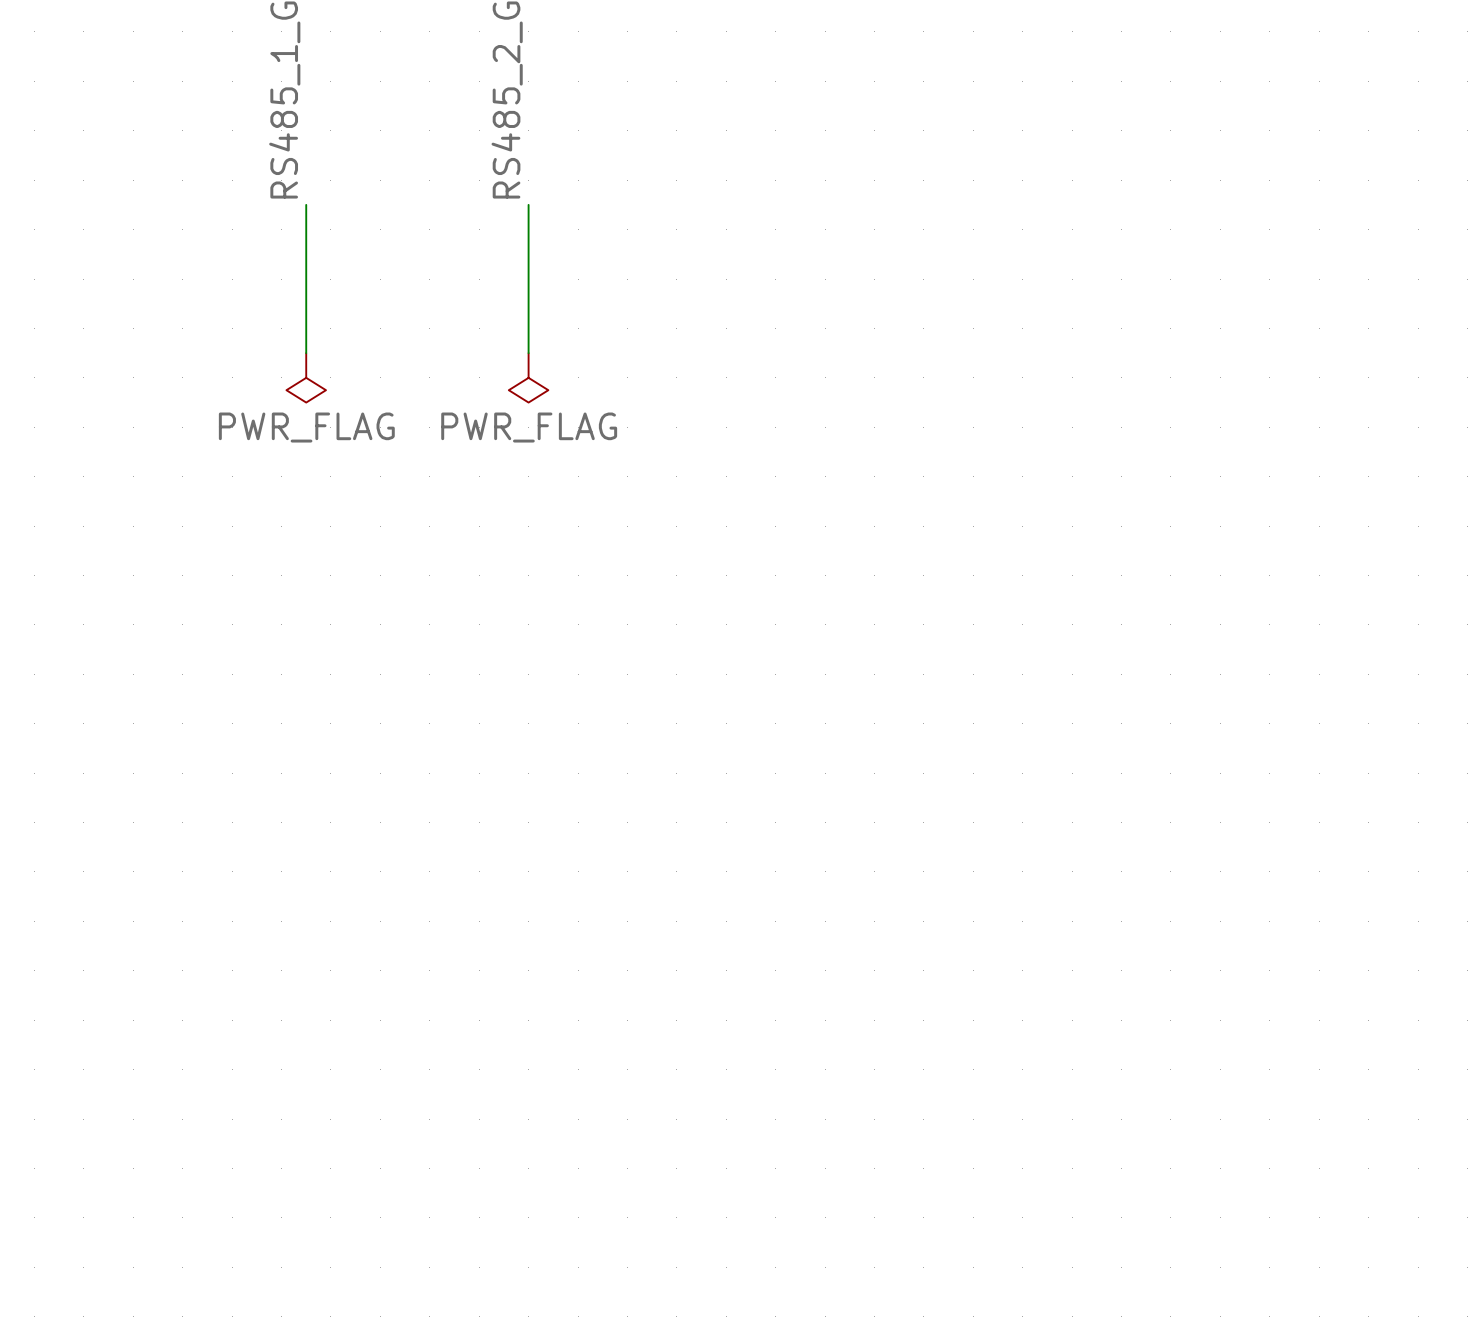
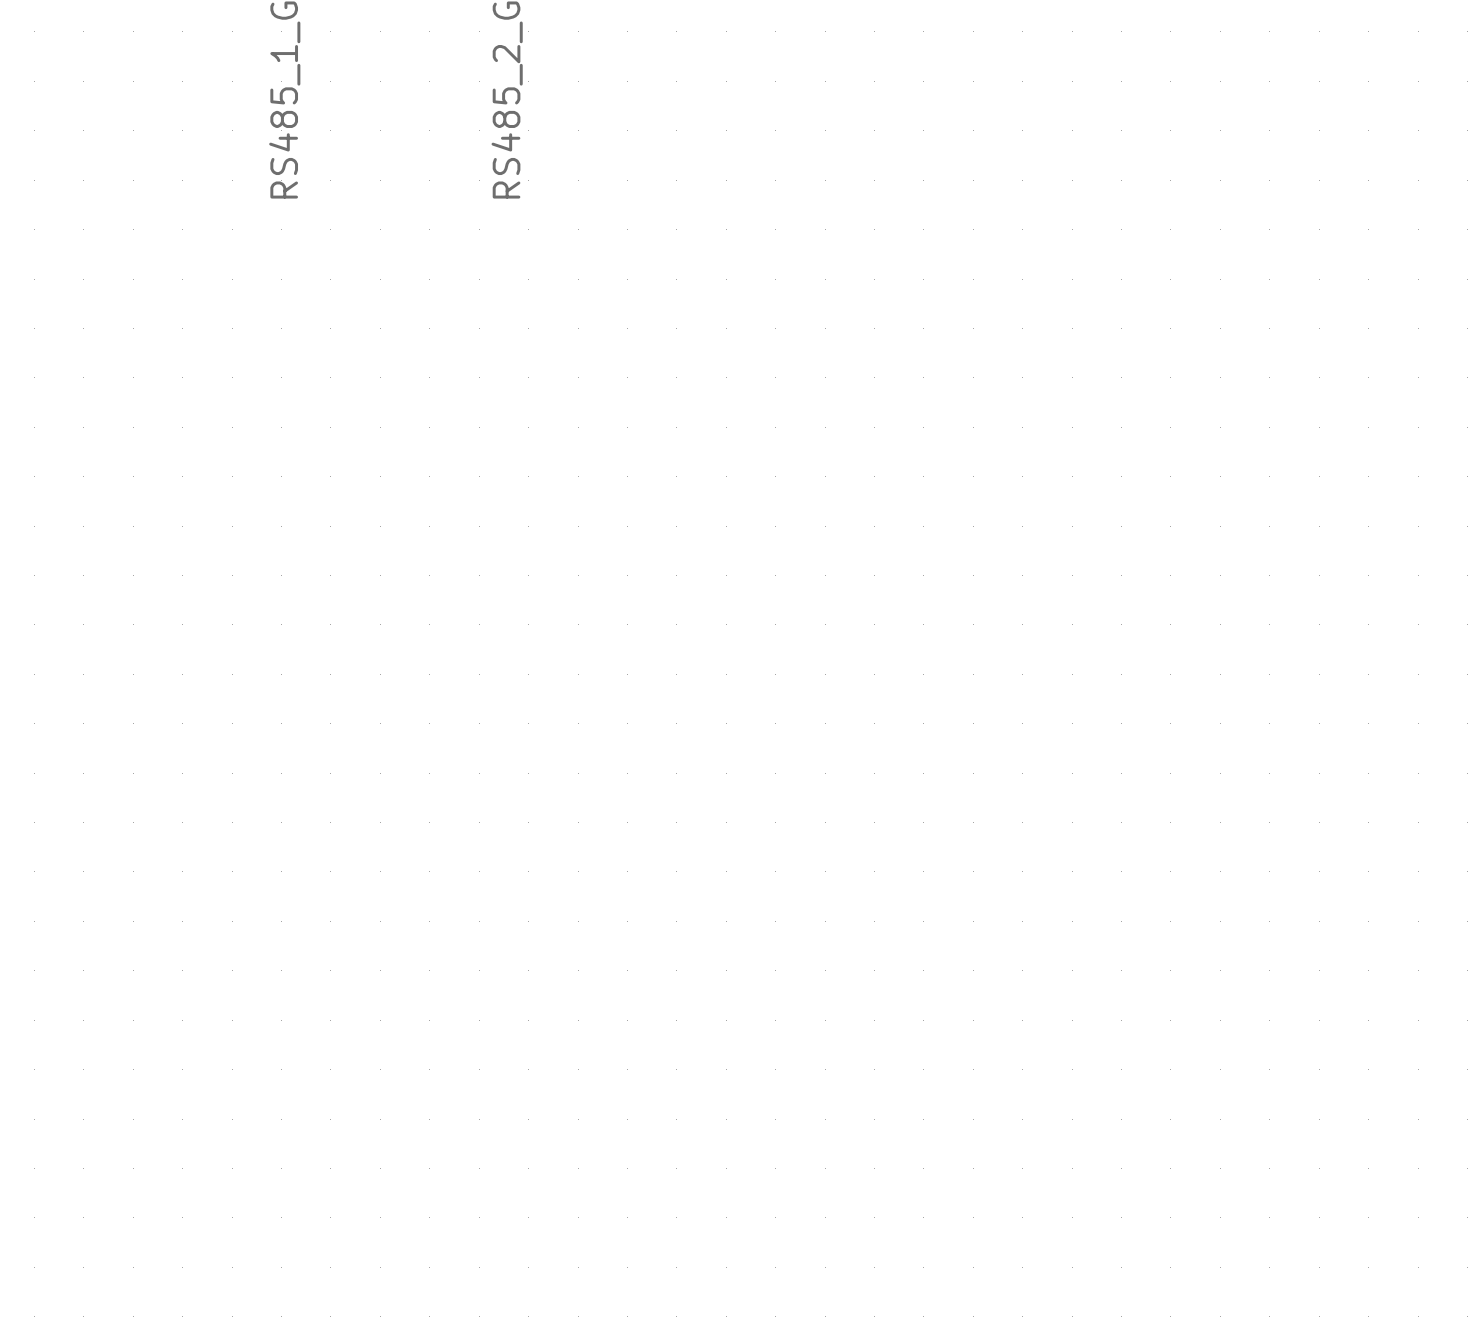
wire: (306, 204) (306, 353) -> none
wire: (528, 204) (528, 353) -> none
power symbol: PWR_FLAG (306, 377) -> none
power symbol: PWR_FLAG (528, 377) -> none

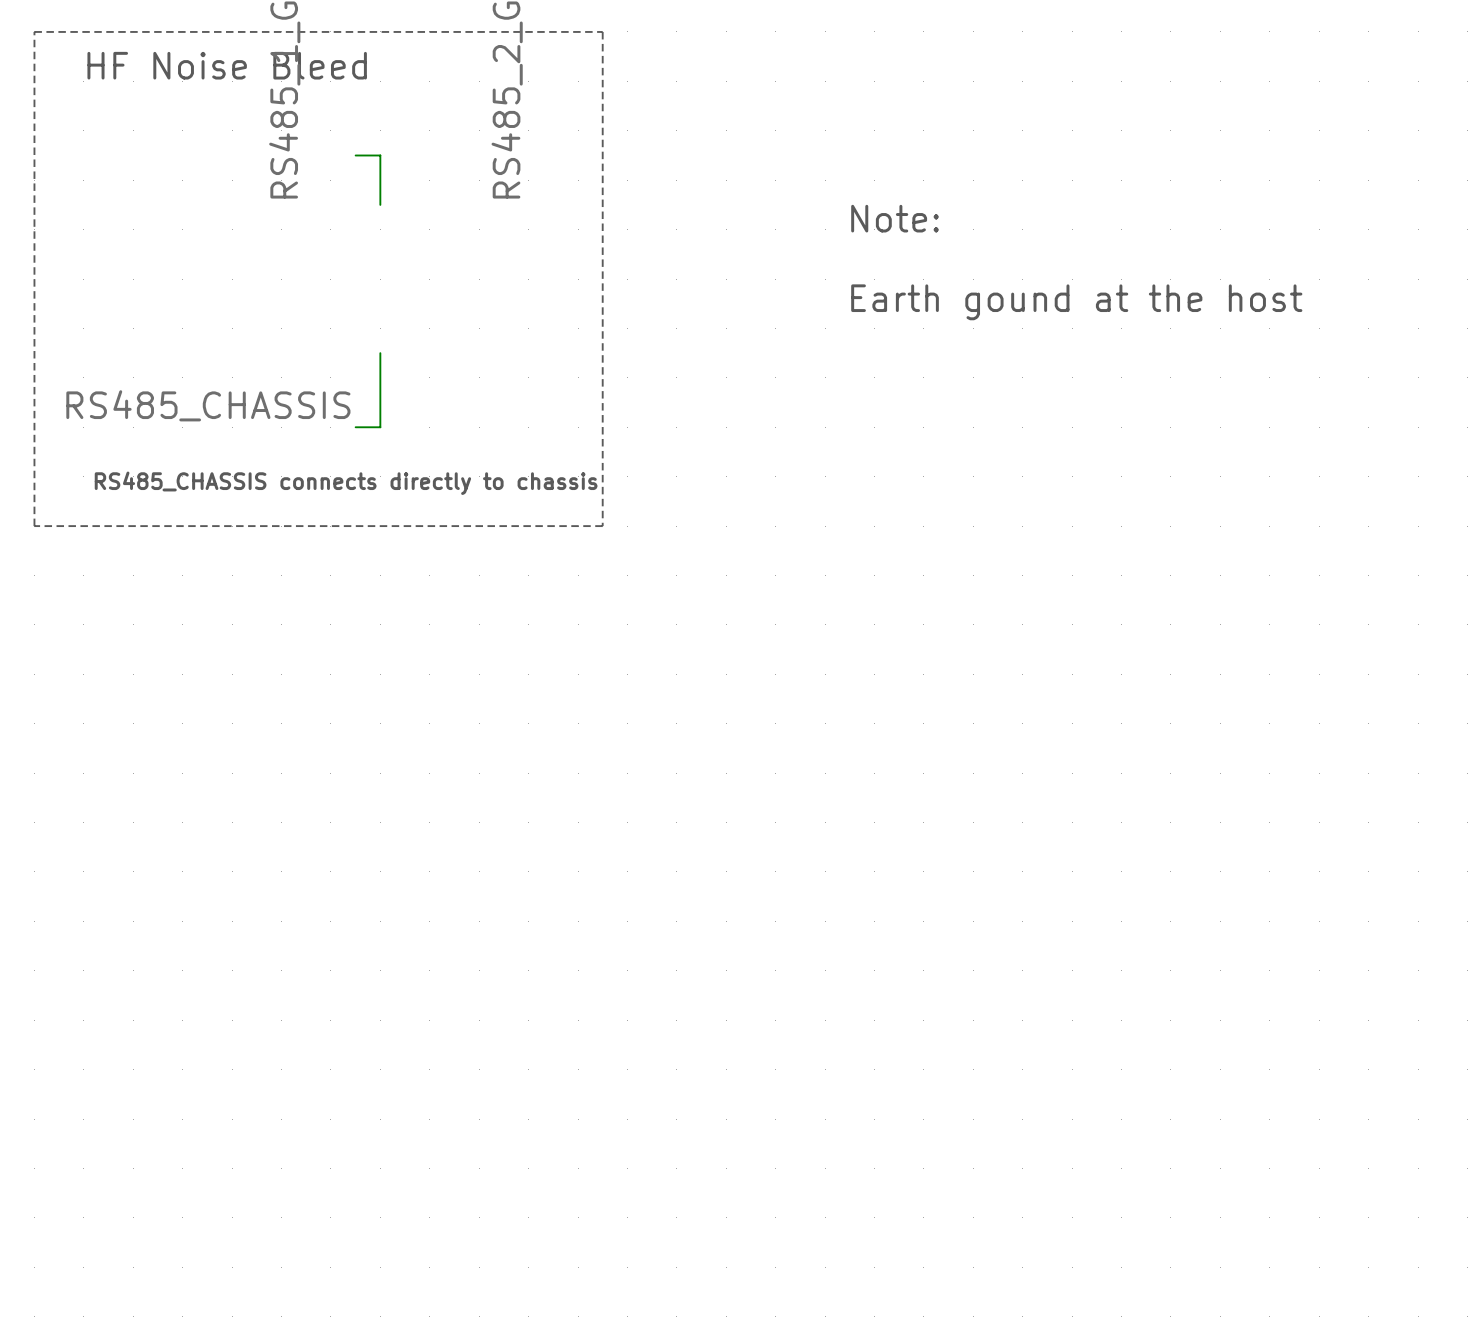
line: none -> (34, 31) (602, 31) (602, 526) (34, 526) (34, 31)
text: none -> HF Noise Bleed (227, 65)
wire: none -> (355, 155) (380, 155) (380, 204)
text: none -> Note: (895, 218)
text: none -> Earth gound at the host (1076, 302)
wire: none -> (380, 353) (380, 427) (355, 427)
label: none -> RS485_CHASSIS (208, 405)
text: none -> RS485_CHASSIS connects directly to chassis (346, 483)

